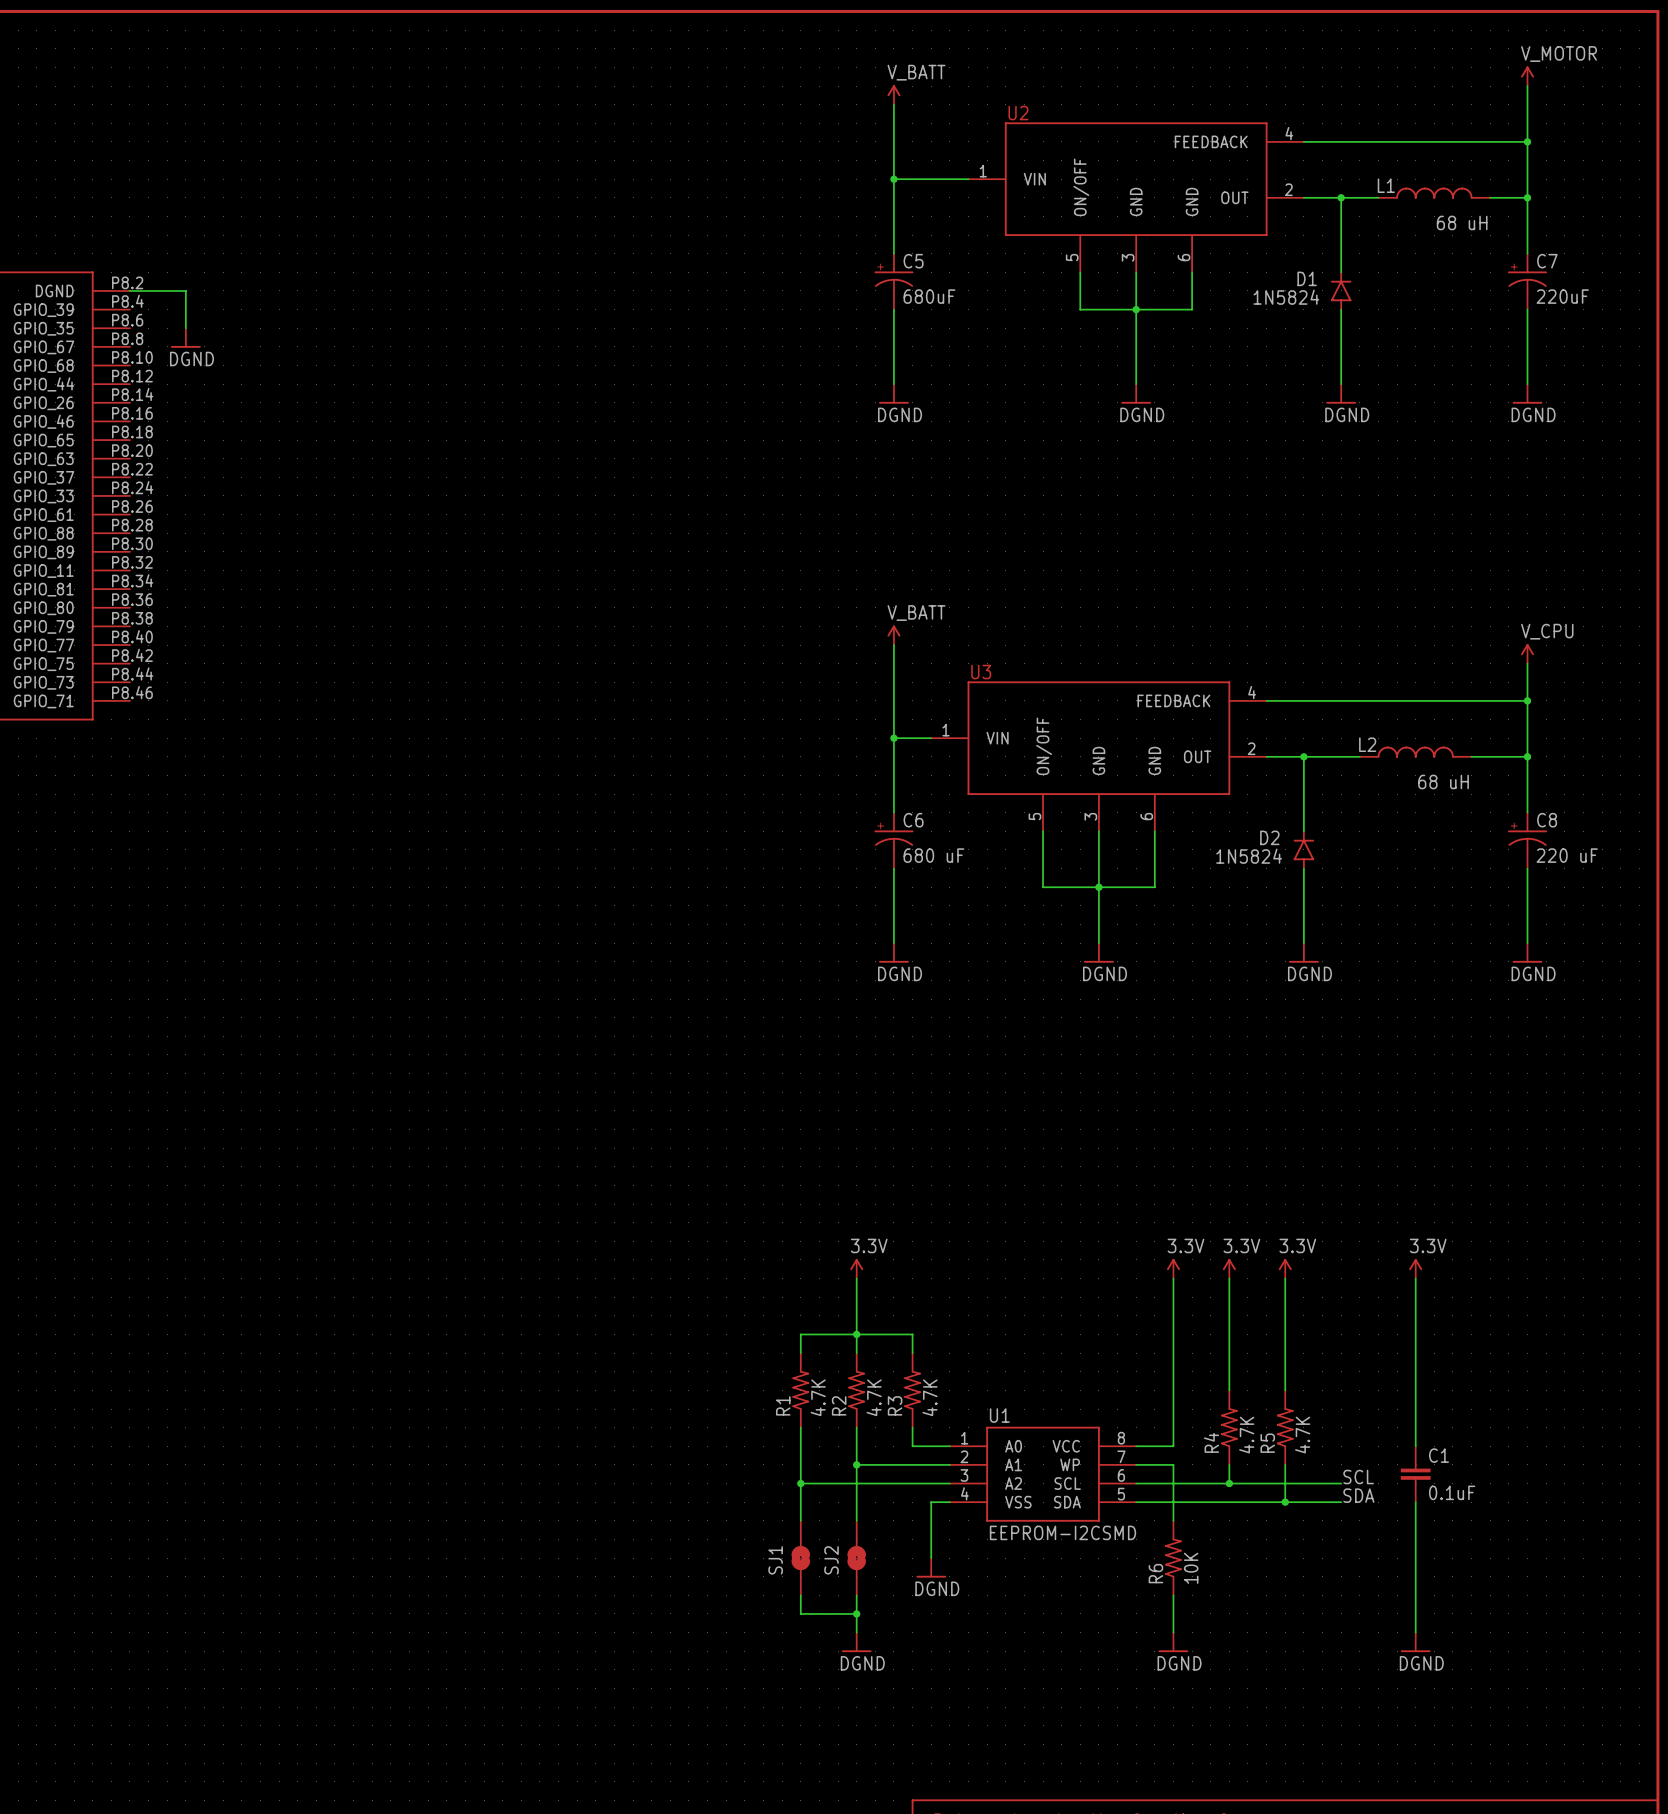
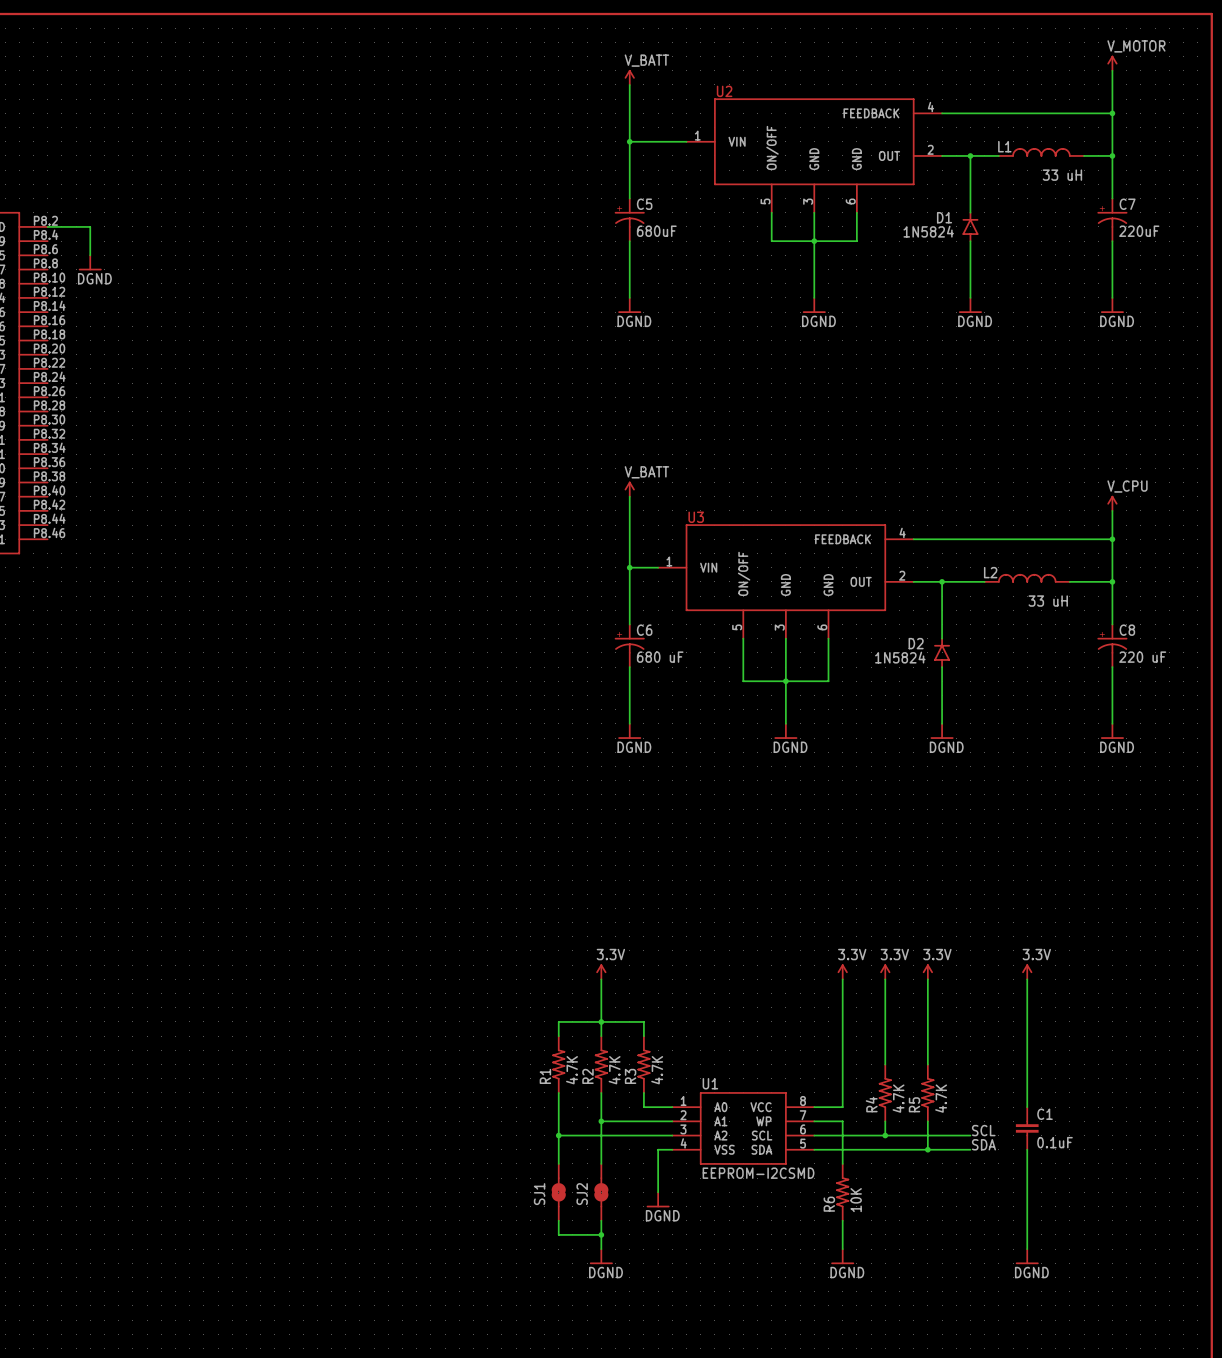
L1 value: 68 uH (1462, 222) -> 33 uH (1062, 175)
L2 value: 68 uH (1443, 781) -> 33 uH (1048, 601)

